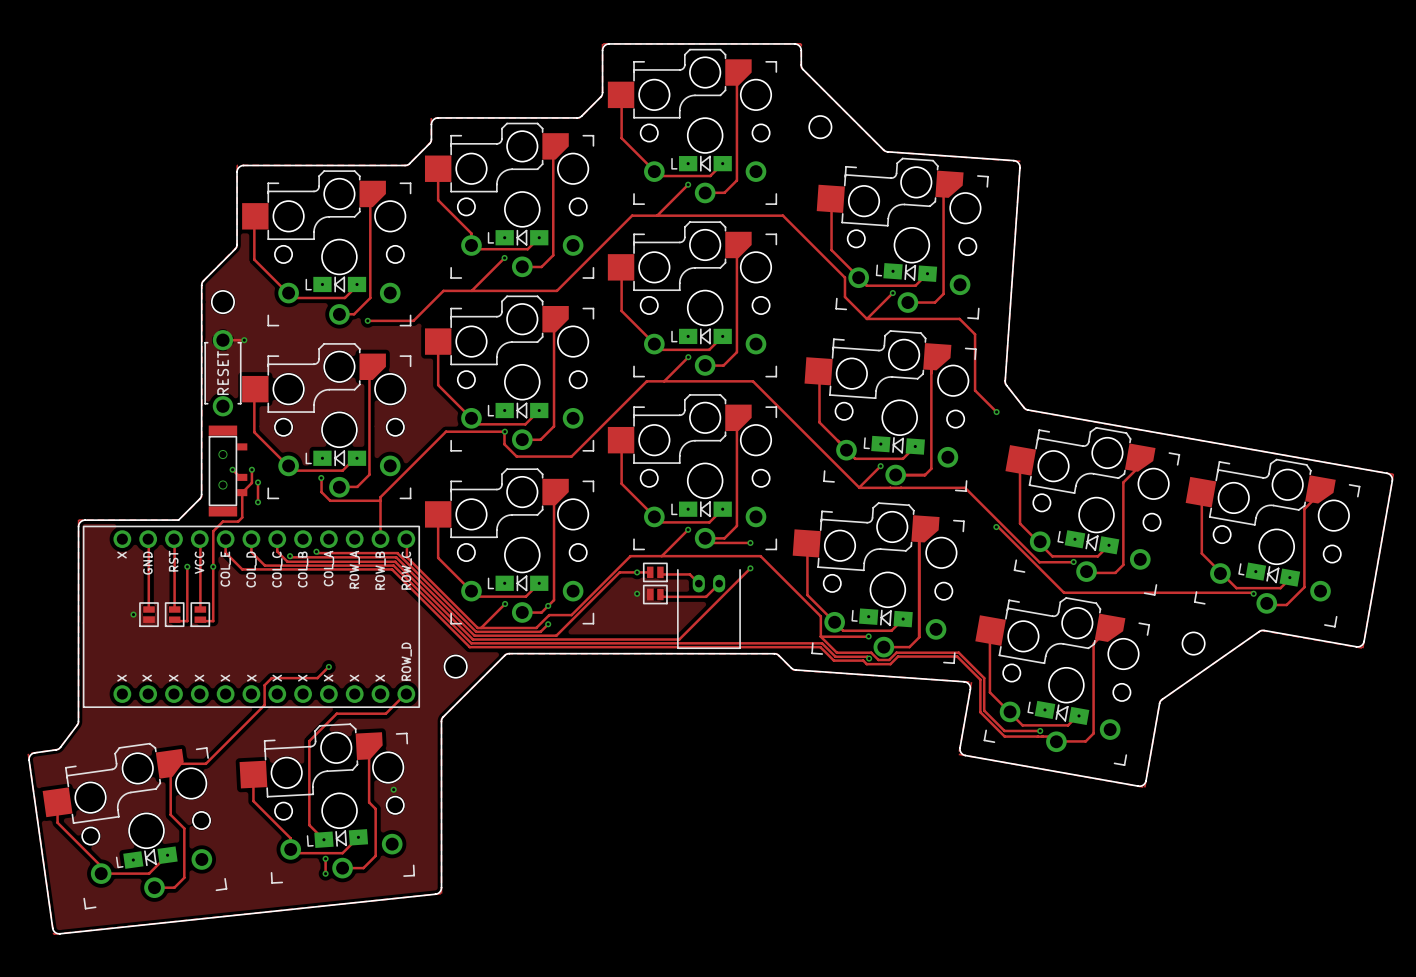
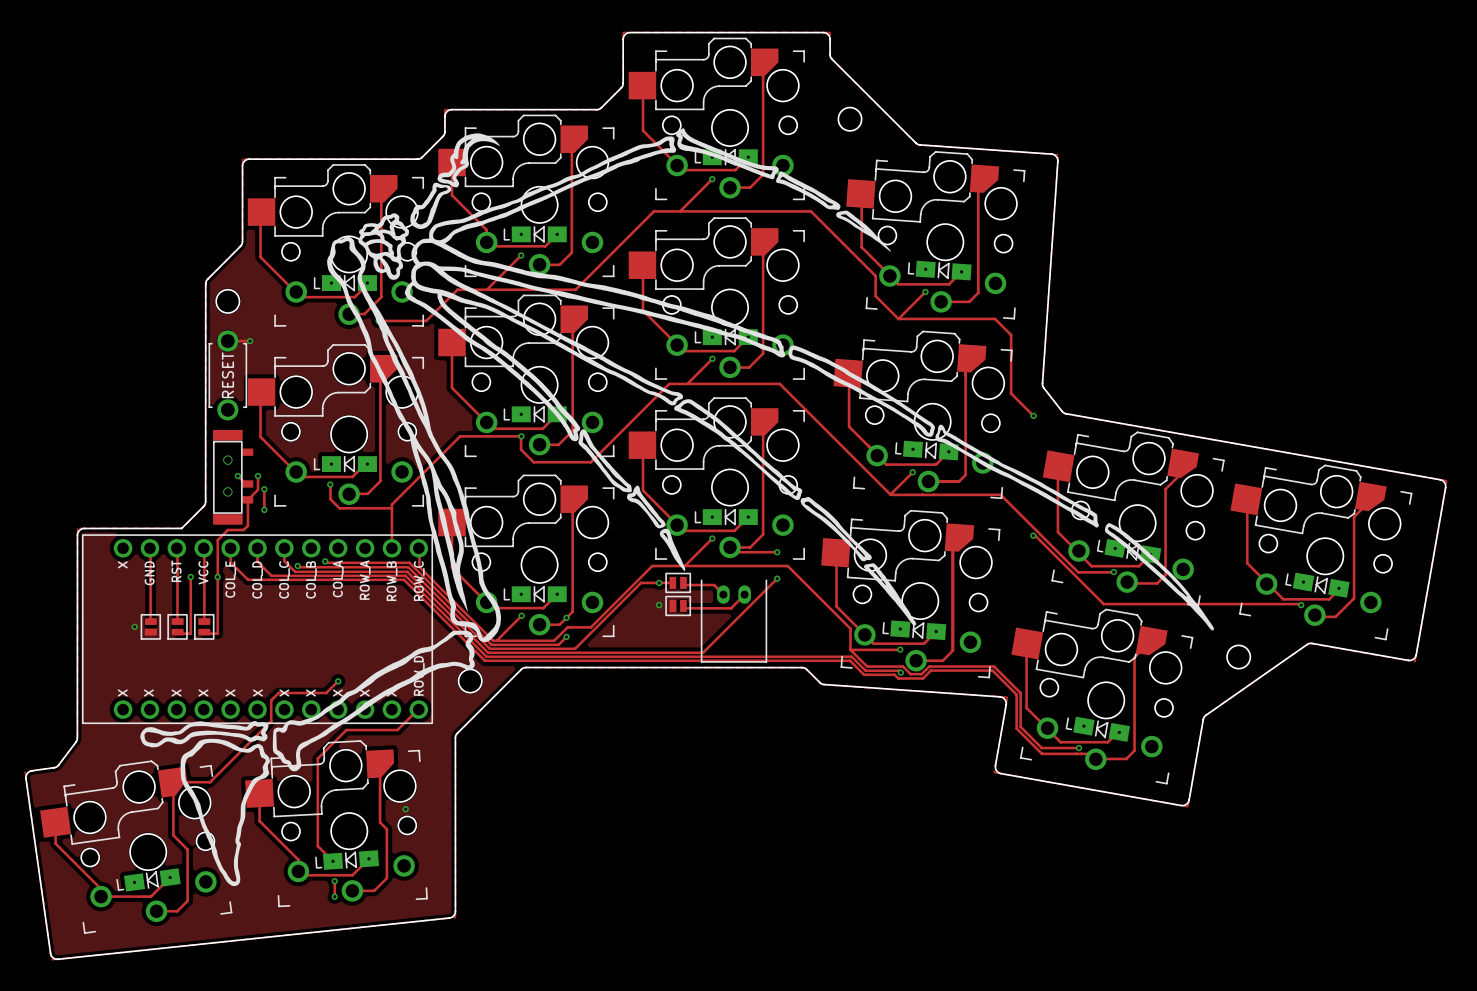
drawing: none -> [140, 128, 1214, 887]

